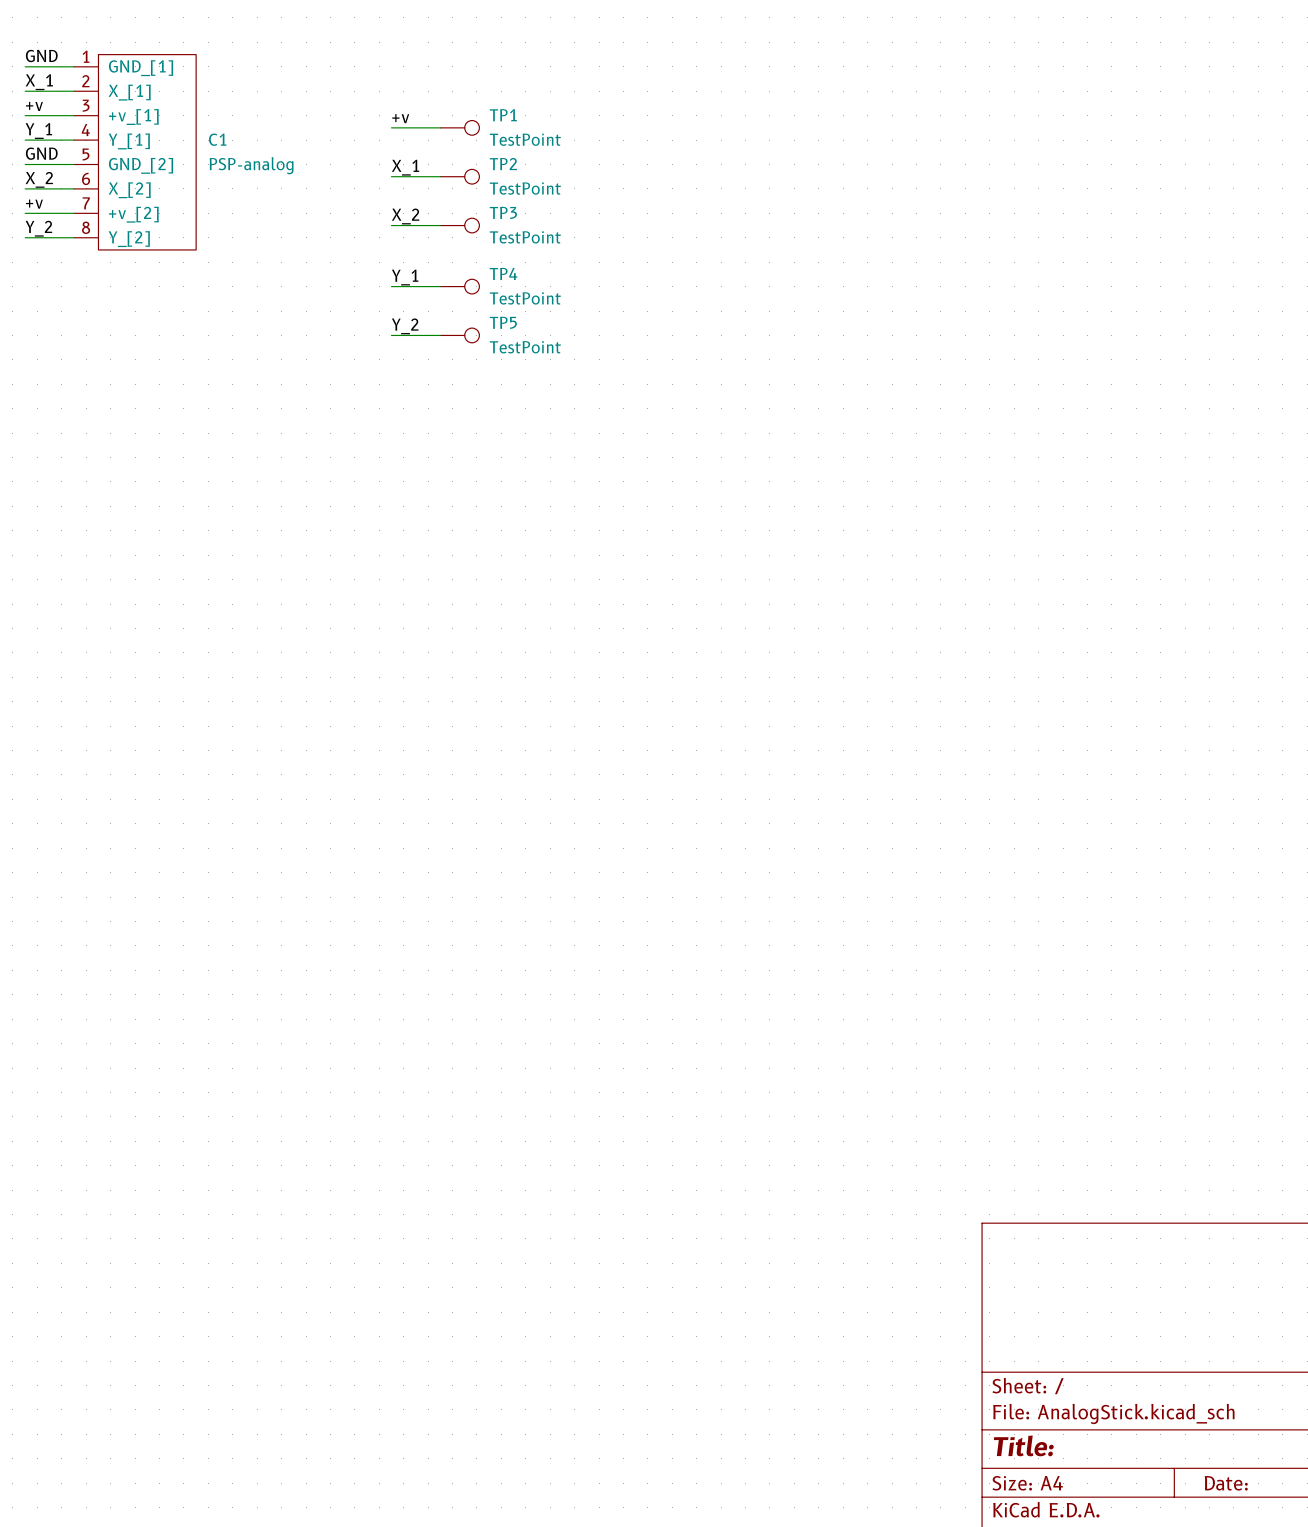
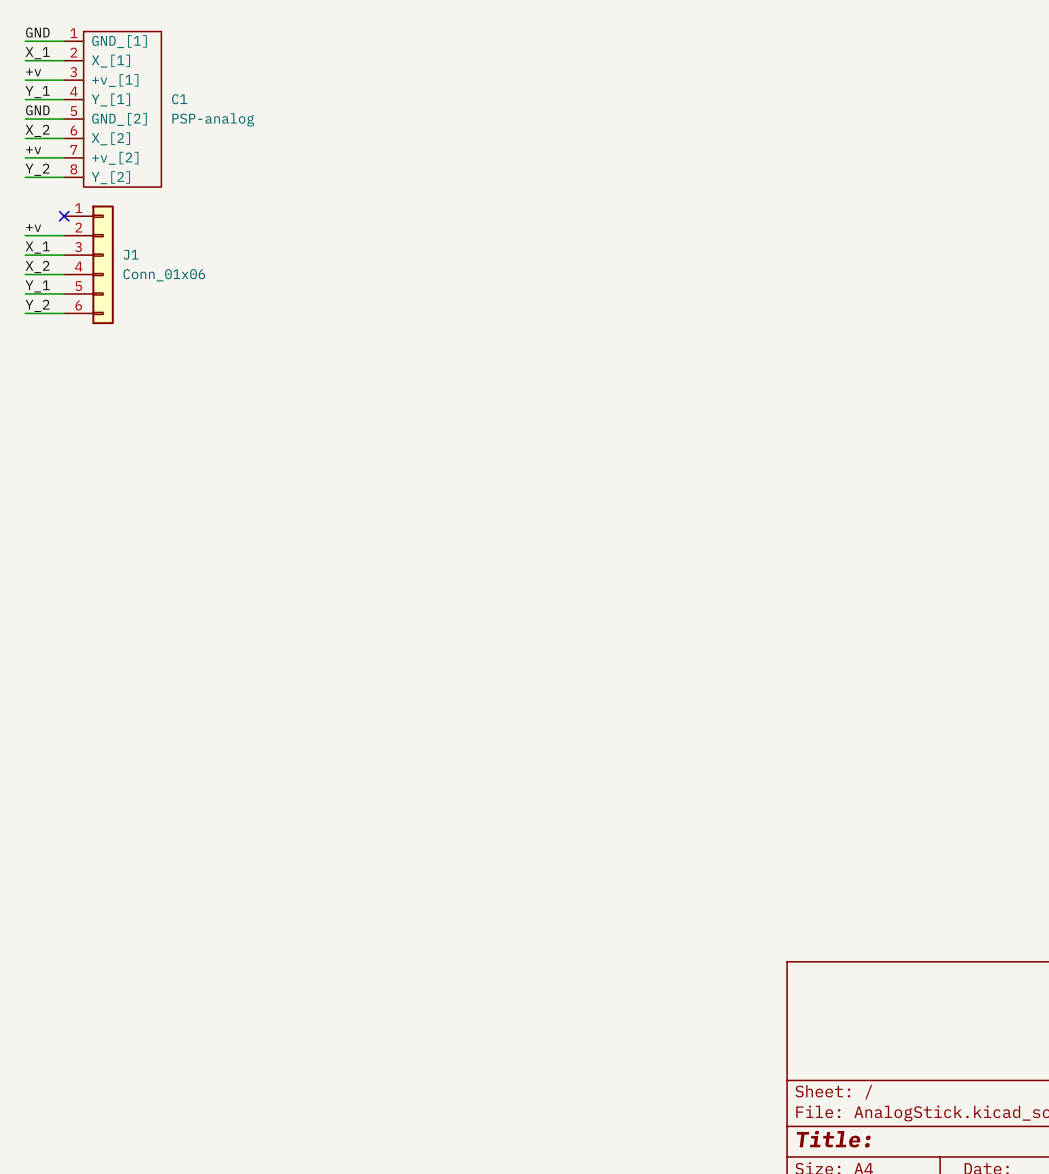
label: +v (400, 118) -> none
wire: (391, 127) (440, 127) -> none
TP1: TestPoint (459, 127) -> none
label: X_1 (405, 167) -> none
wire: (391, 176) (440, 176) -> none
TP2: TestPoint (459, 176) -> none
label: X_2 (405, 216) -> none
wire: (391, 225) (440, 225) -> none
TP3: TestPoint (459, 225) -> none
label: Y_1 (405, 277) -> none
no-connect mark: none -> (64, 216)
wire: (391, 286) (440, 286) -> none
TP4: TestPoint (459, 286) -> none
label: none -> +v (33, 228)
wire: none -> (25, 235) (64, 235)
label: none -> X_1 (37, 247)
label: Y_2 (405, 326) -> none
wire: none -> (25, 255) (64, 255)
wire: (391, 335) (440, 335) -> none
TP5: TestPoint (459, 335) -> none
J1: none -> Conn_01x06 (88, 264)
label: none -> X_2 (37, 266)
wire: none -> (25, 274) (64, 274)
label: none -> Y_1 (37, 286)
wire: none -> (25, 293) (64, 293)
label: none -> Y_2 (37, 305)
wire: none -> (25, 313) (64, 313)

